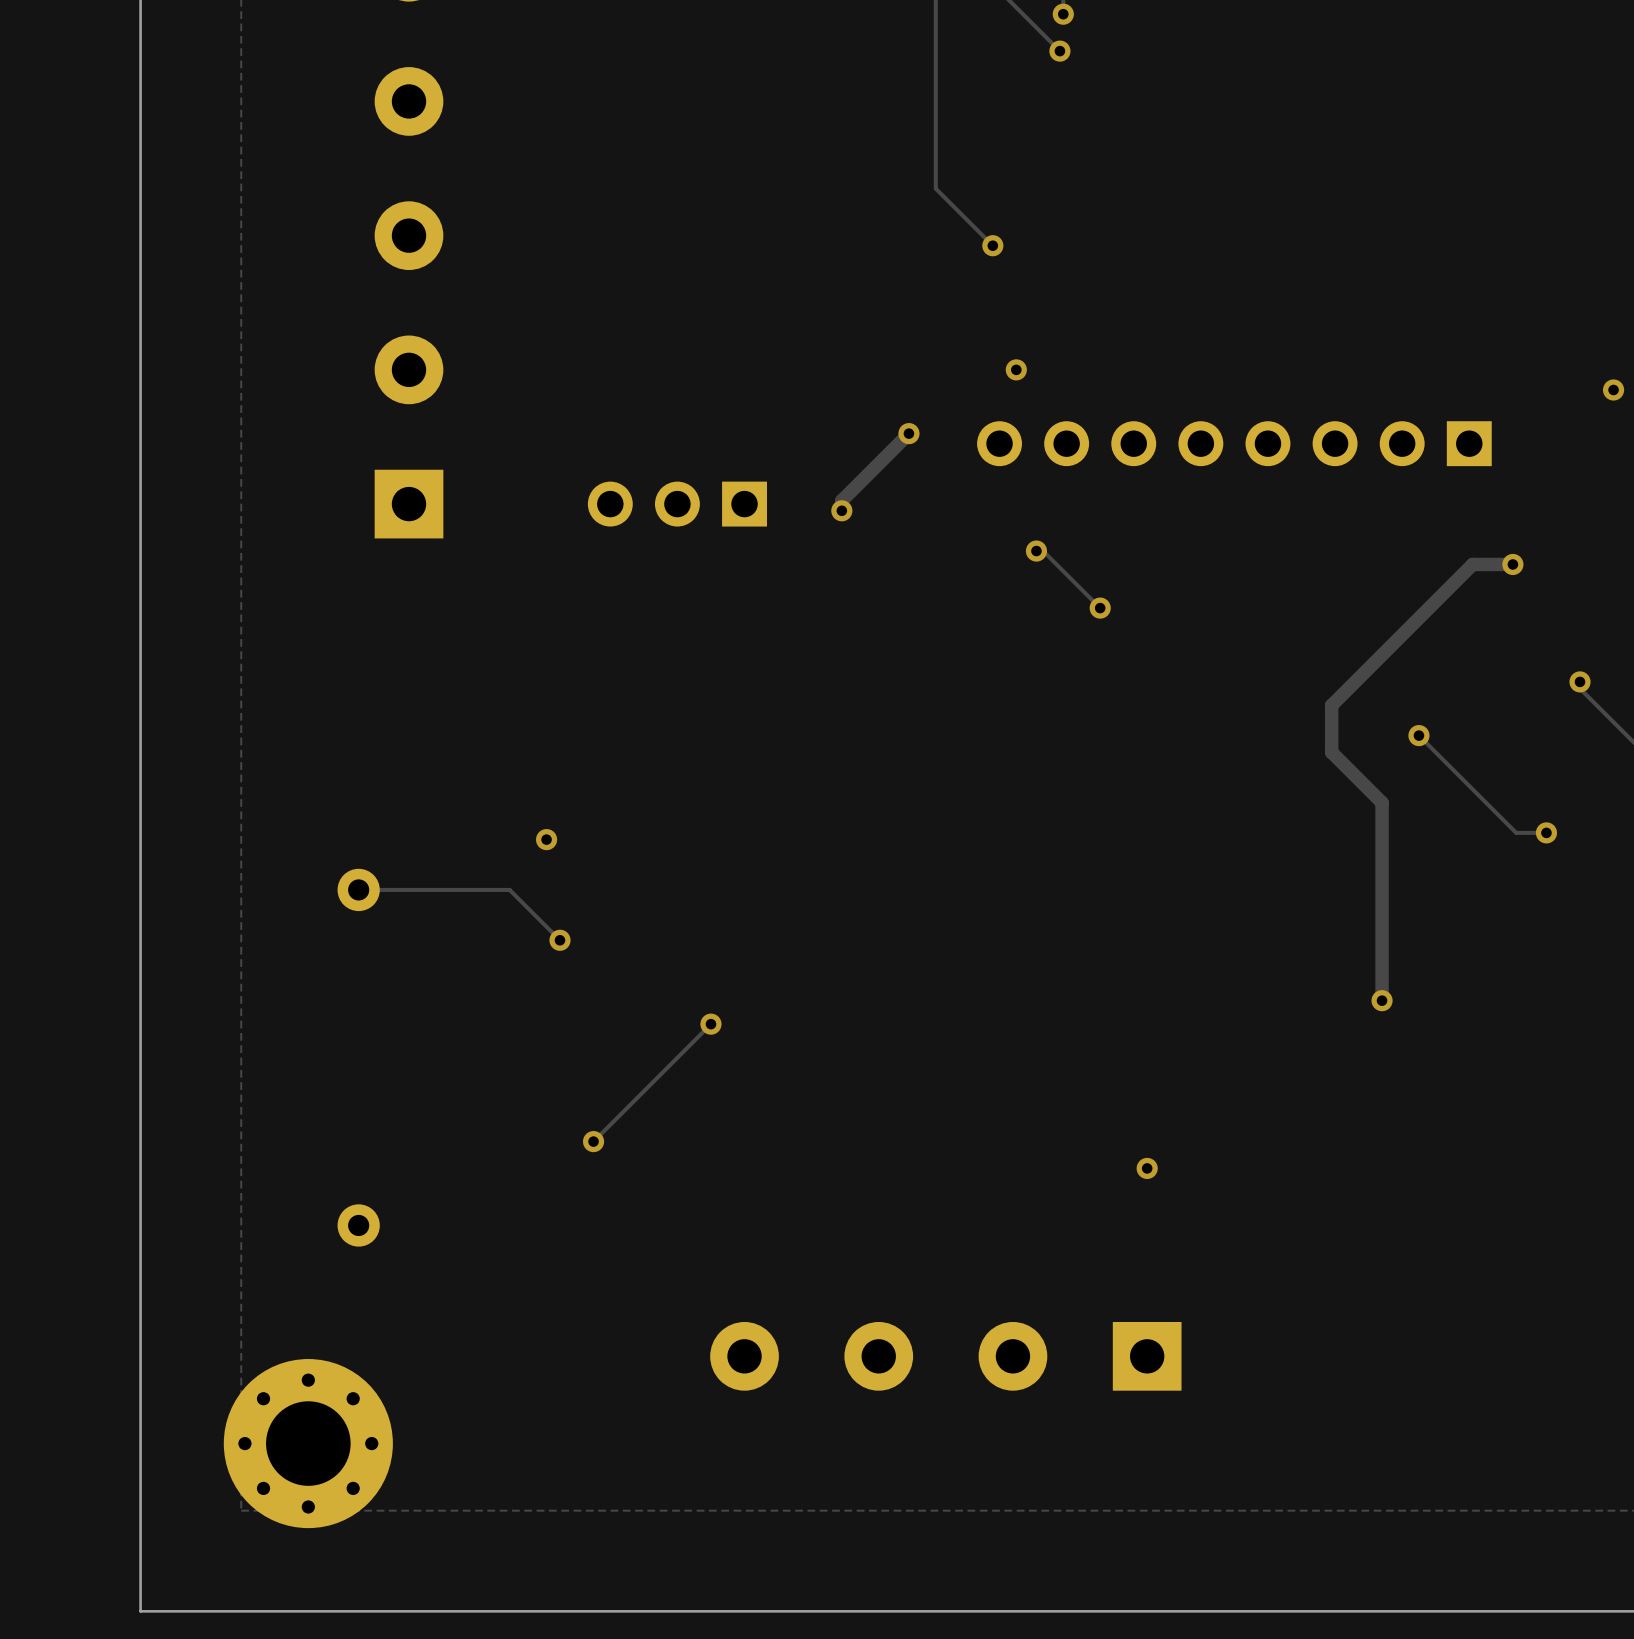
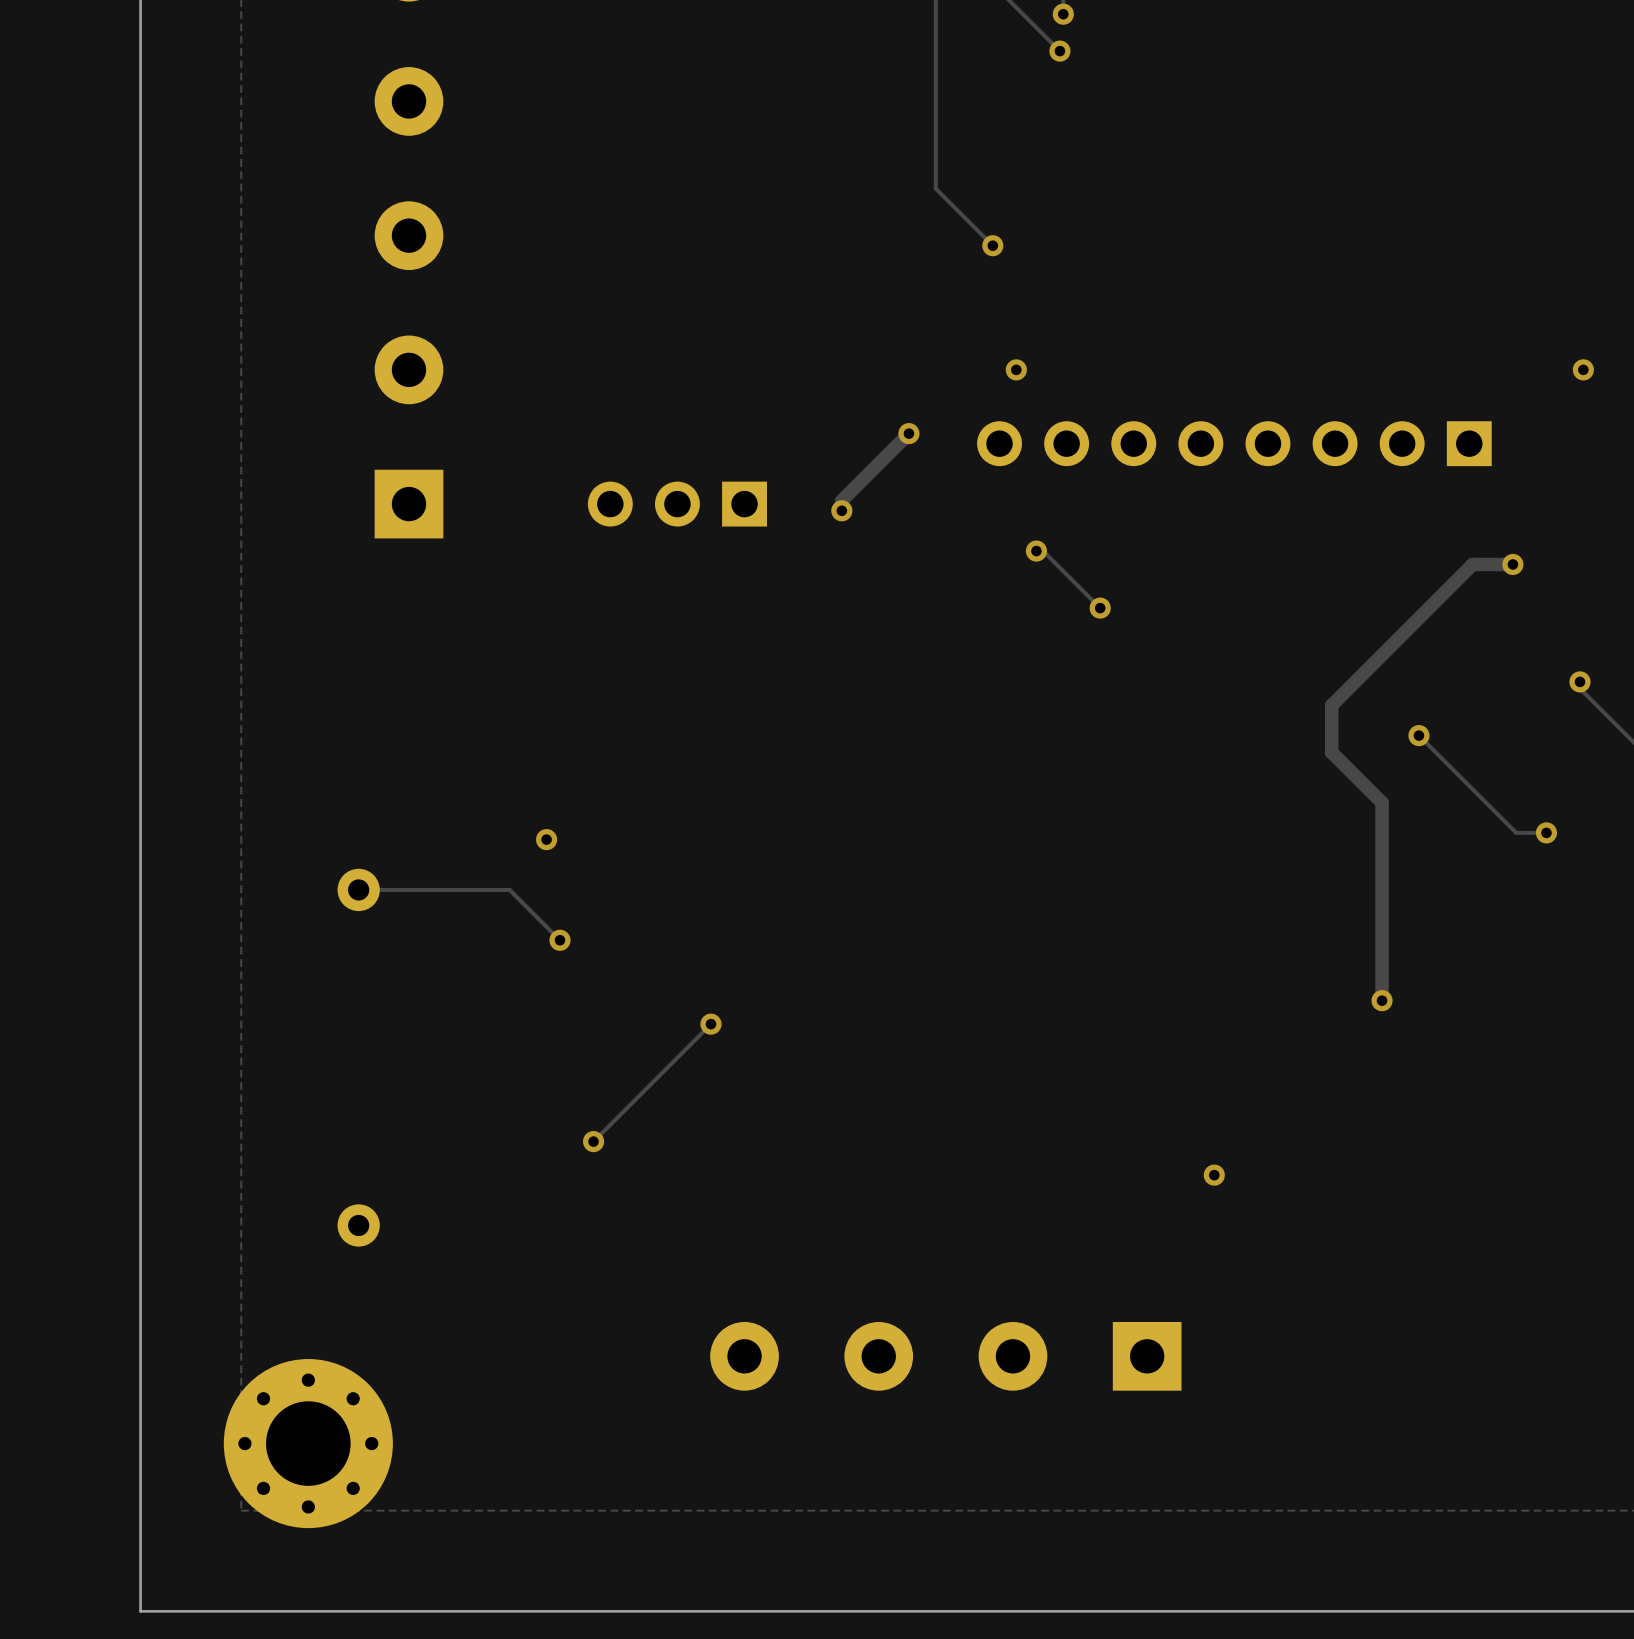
via position: (1613, 389) -> (1583, 369)
via position: (1147, 1168) -> (1214, 1175)

